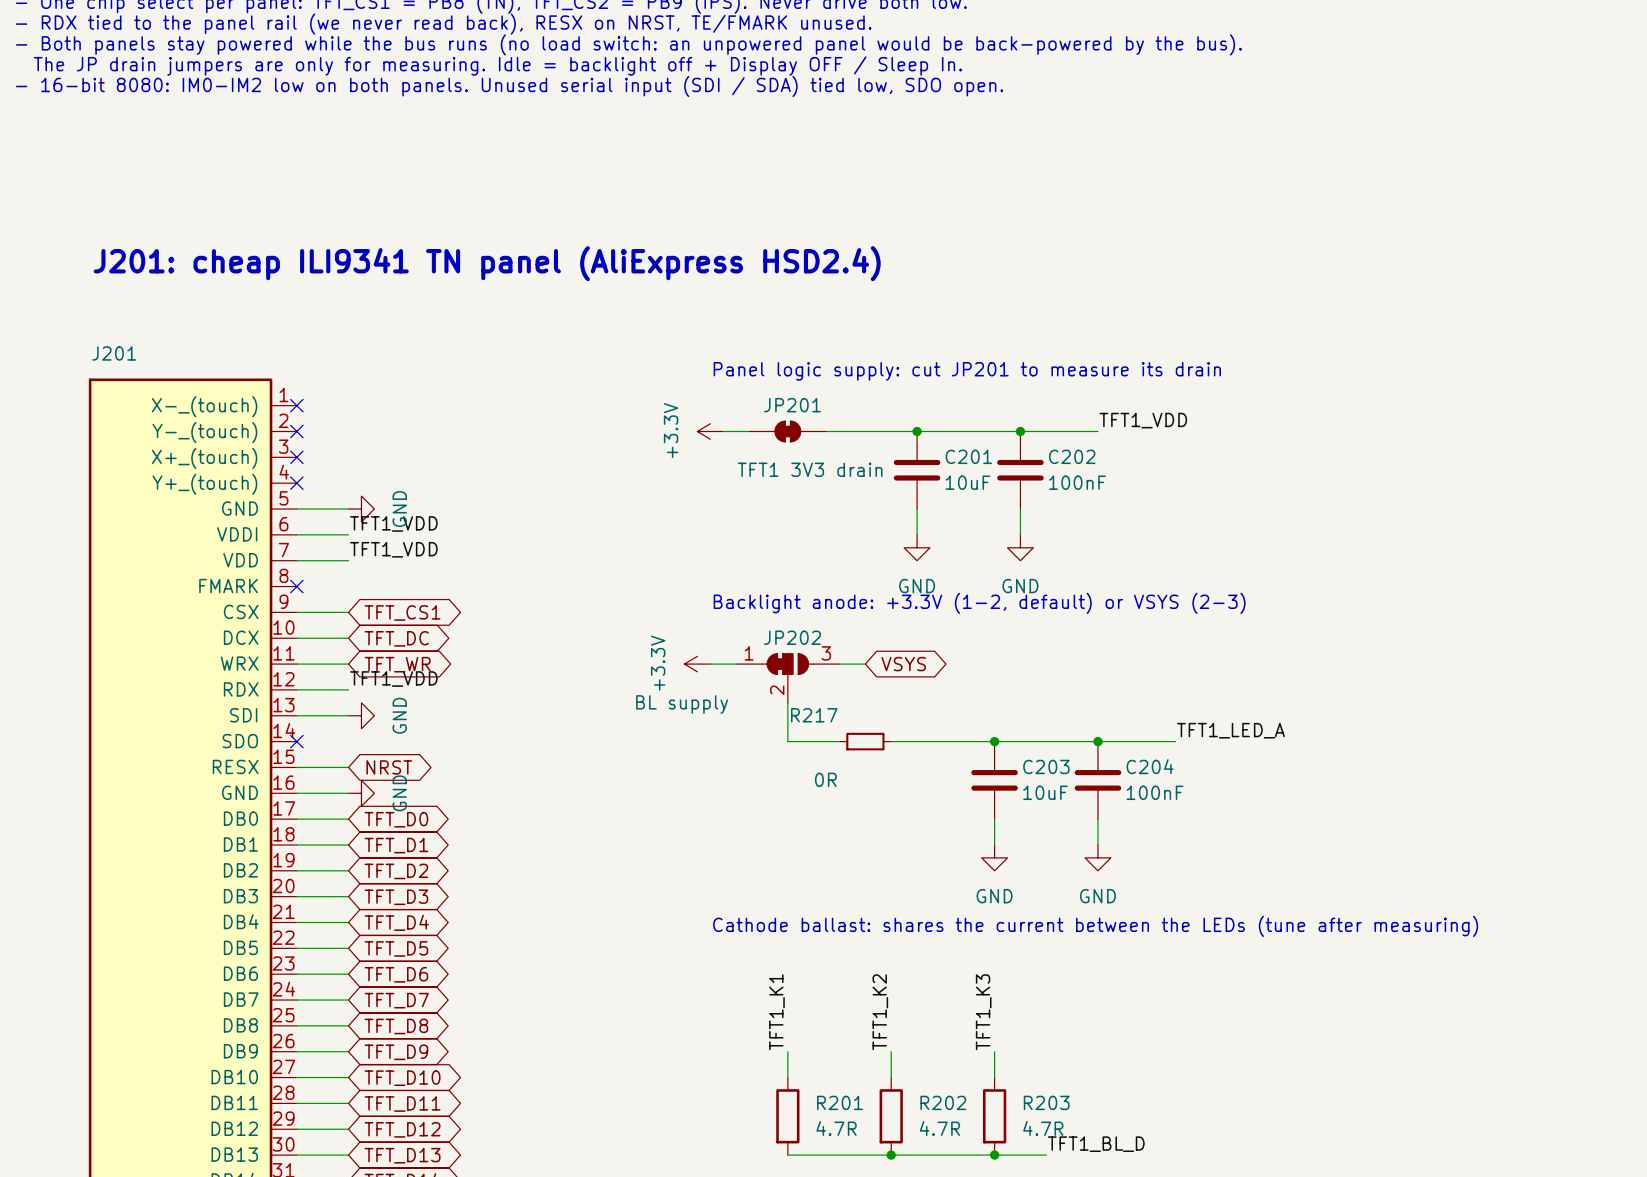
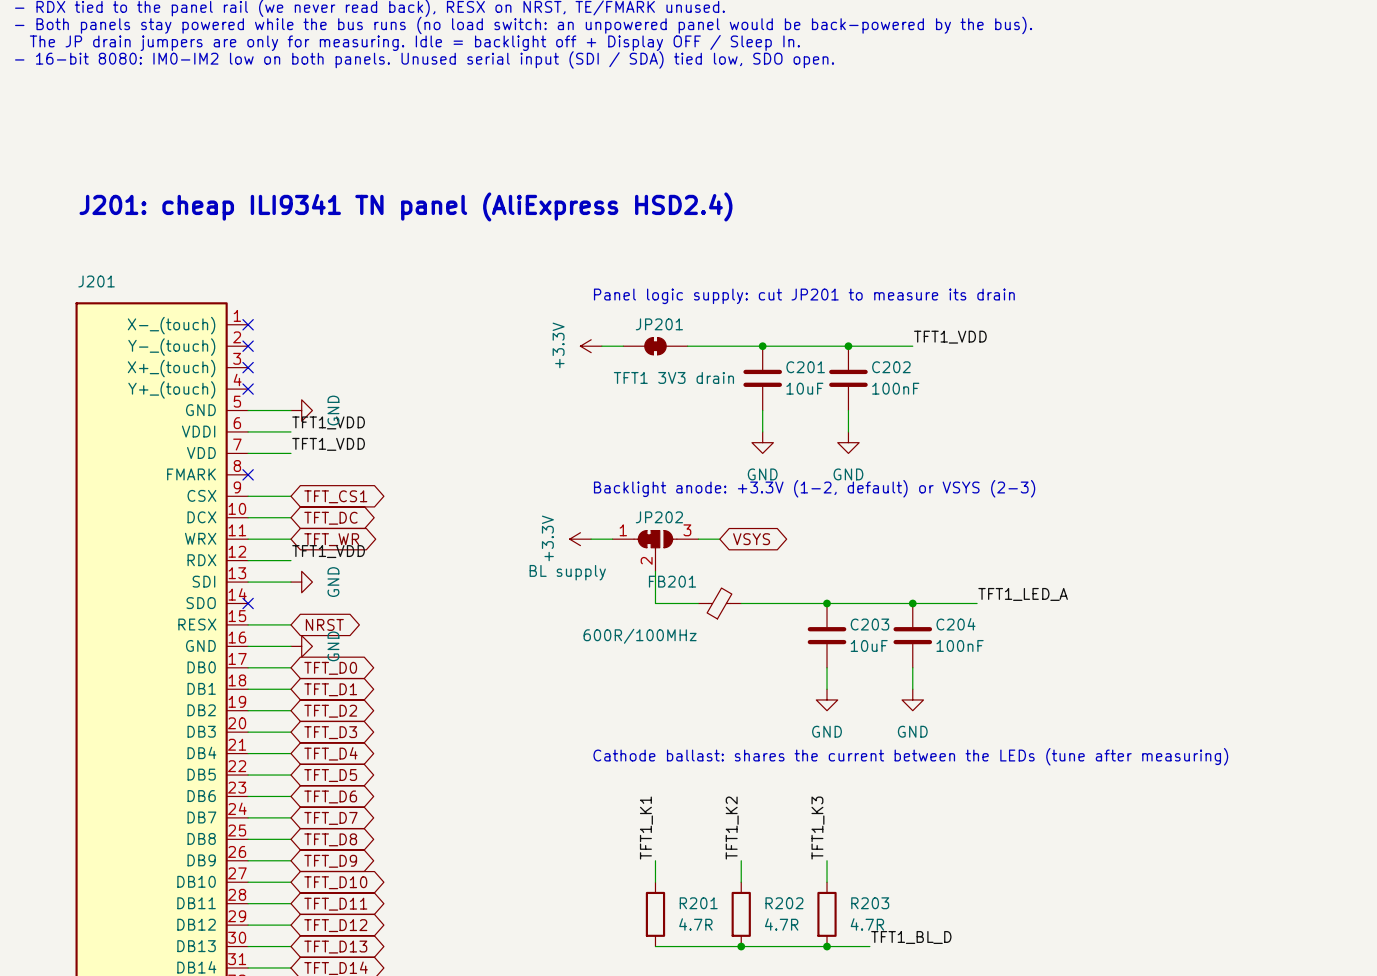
R217: 0R (865, 741) -> none
FB201: none -> 600R/100MHz (719, 603)

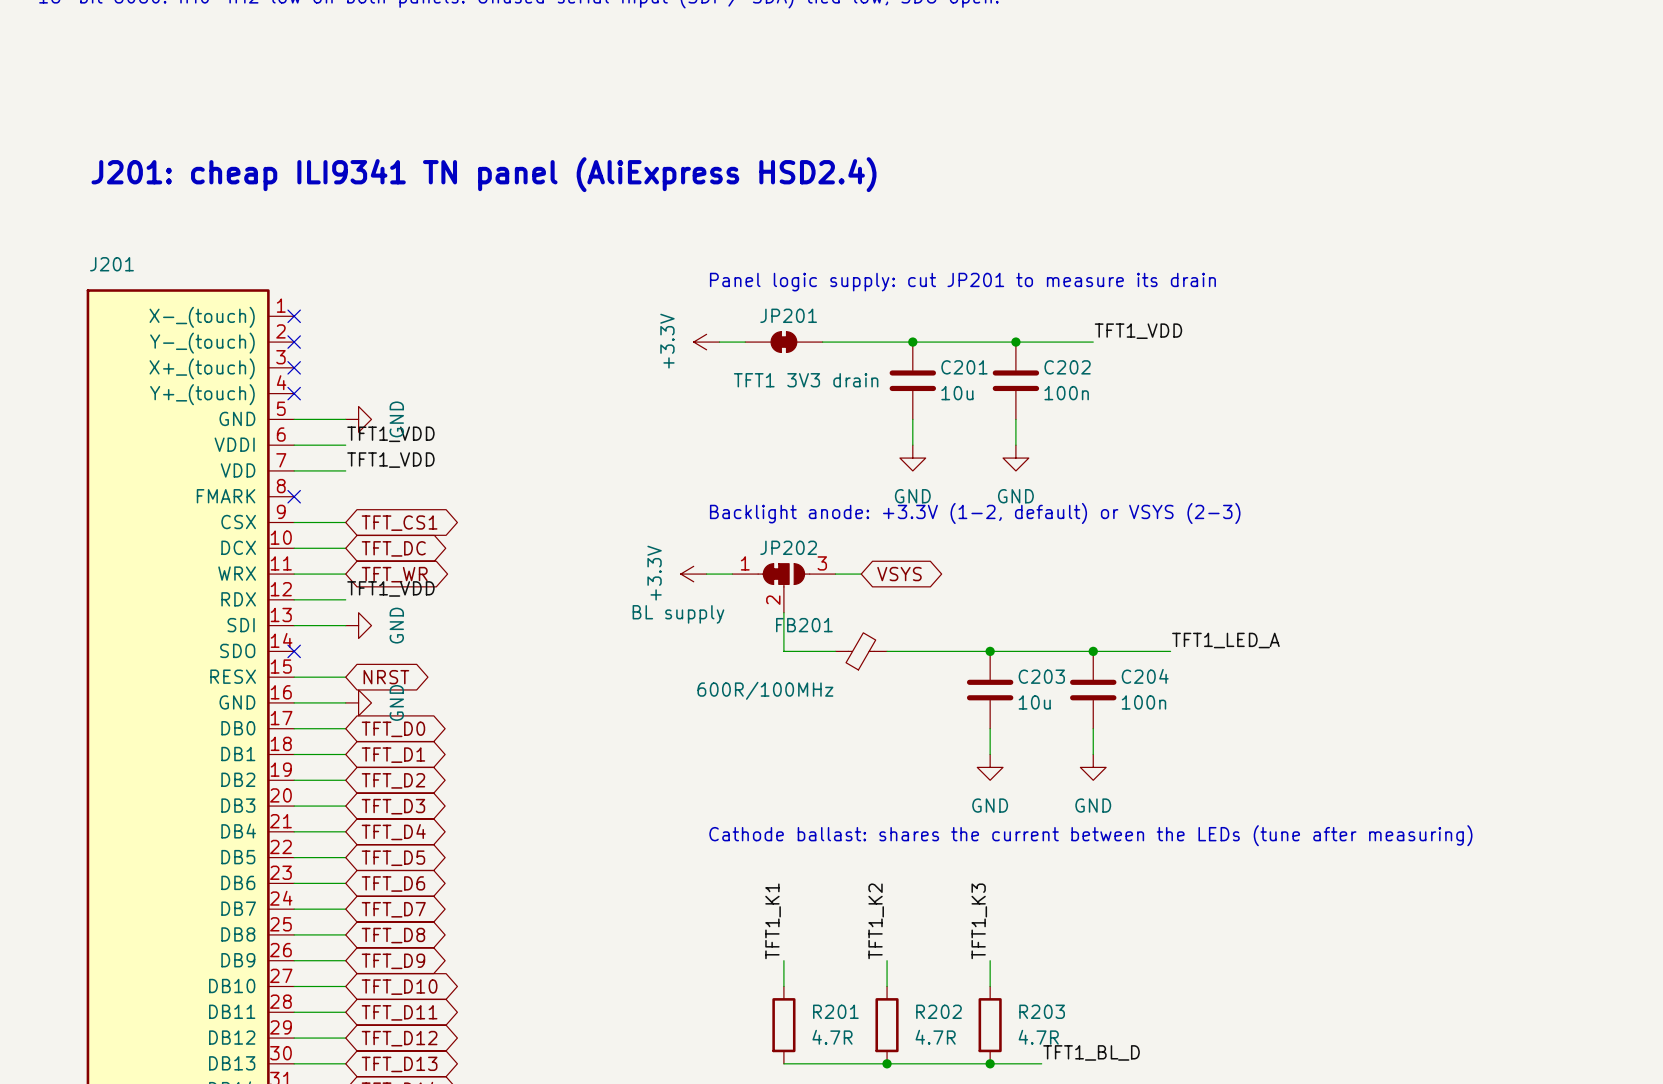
C201 value: 10uF (804, 388) -> 10u (957, 393)
C202 value: 100nF (895, 388) -> 100n (1066, 393)
C203 value: 10uF (869, 645) -> 10u (1034, 702)
C204 value: 100nF (960, 645) -> 100n (1143, 702)

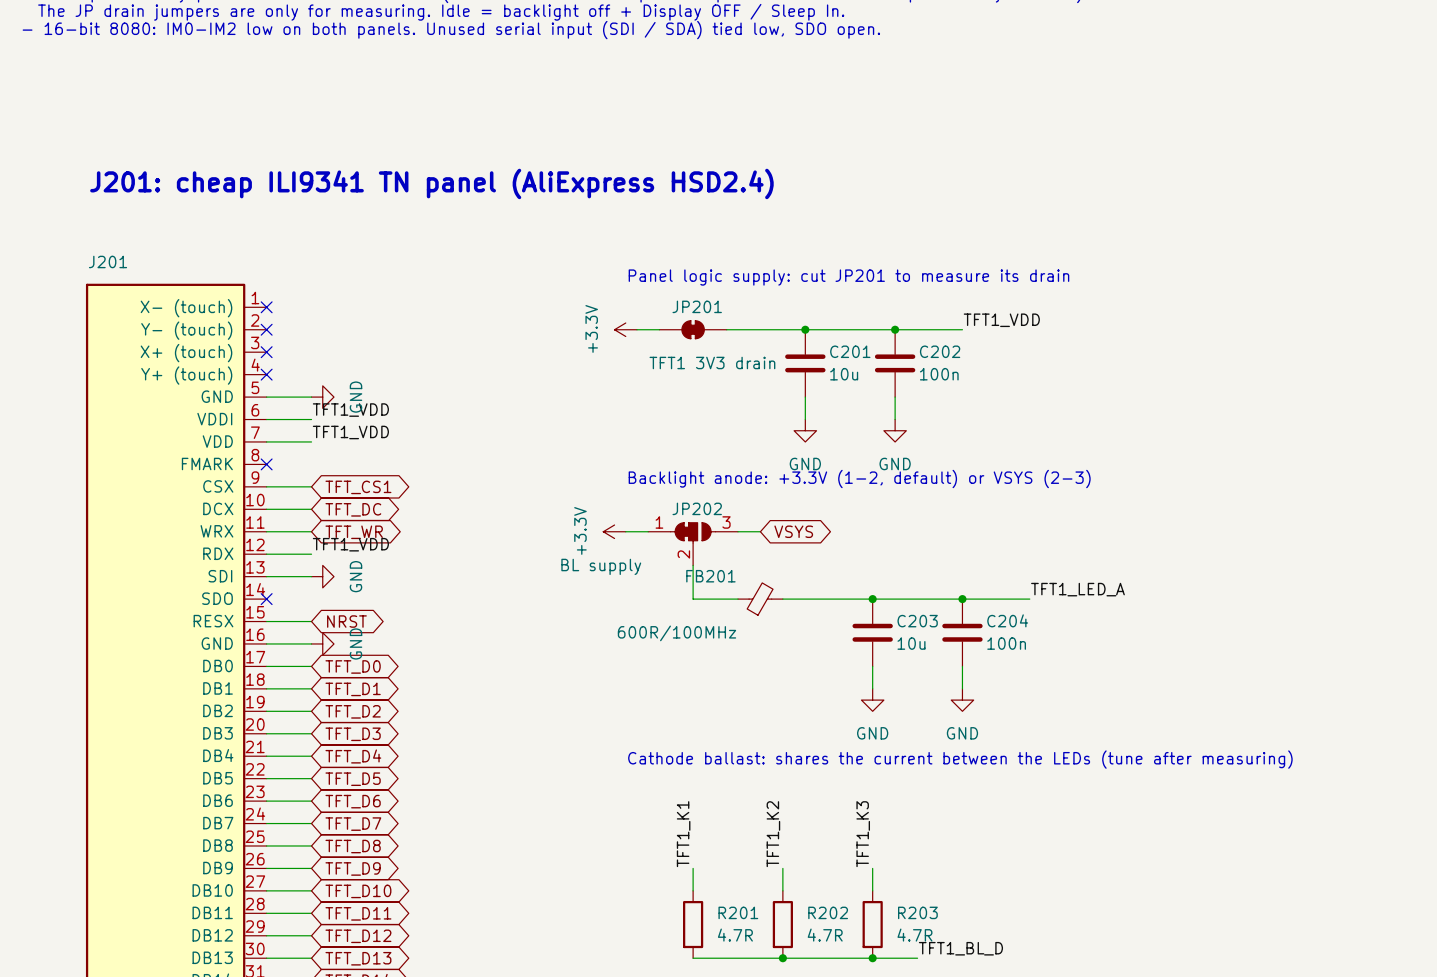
J201 pin name: X-_(touch) (202, 317) -> X- (touch) (186, 308)
J201 pin name: Y-_(touch) (202, 343) -> Y- (touch) (186, 330)
J201 pin name: X+_(touch) (202, 368) -> X+ (touch) (186, 353)
J201 pin name: Y+_(touch) (202, 394) -> Y+ (touch) (186, 375)

